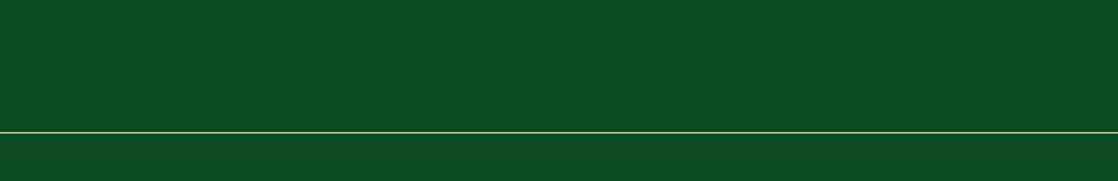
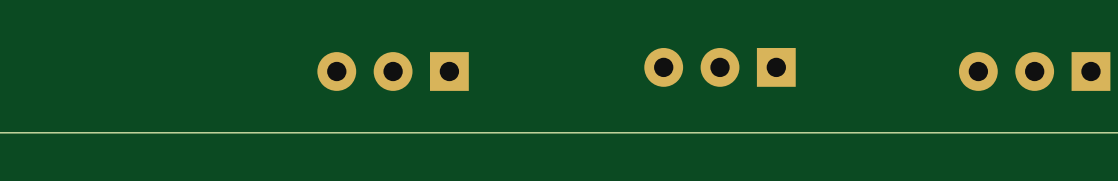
part: none -> (720, 67)
part: none -> (393, 71)
part: none -> (1034, 71)

